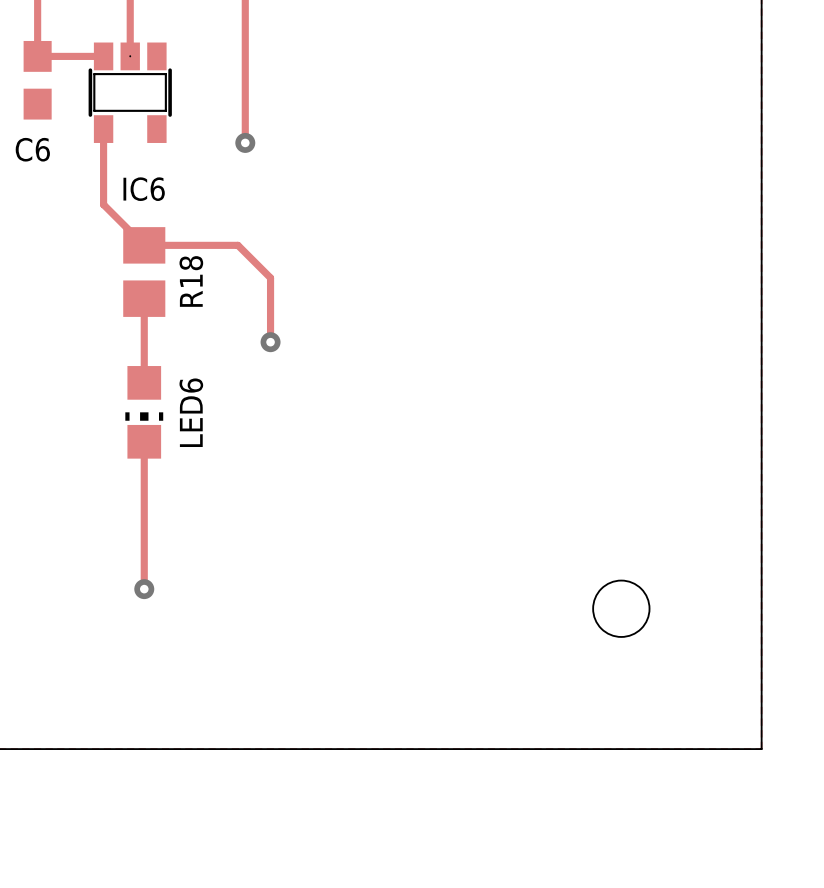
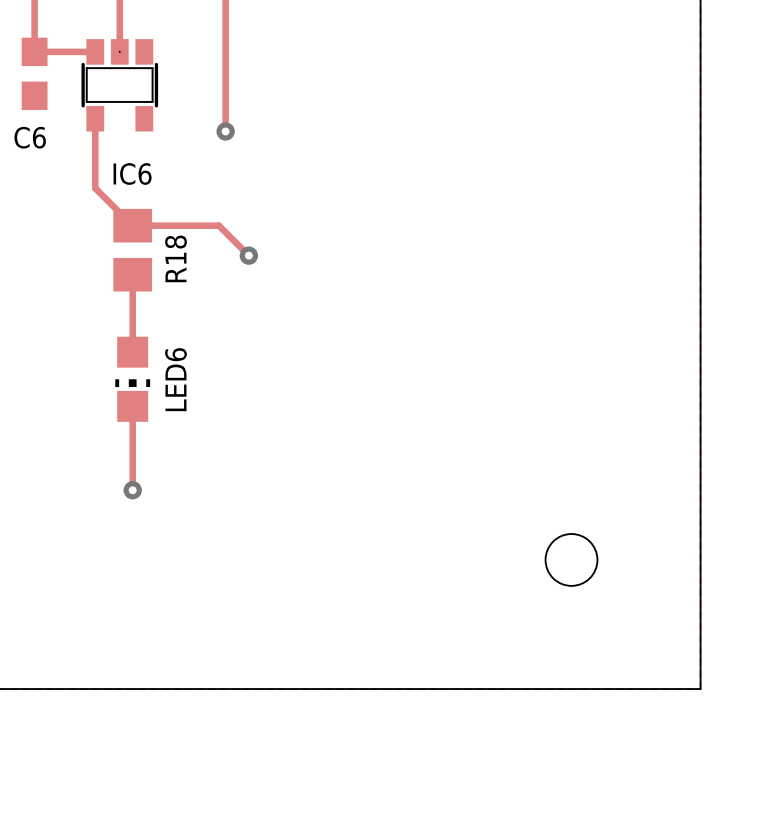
track: (270, 277) (270, 342) -> none
via position: (270, 342) -> (248, 255)
track: (144, 532) (144, 589) -> none
via position: (144, 589) -> (132, 490)

